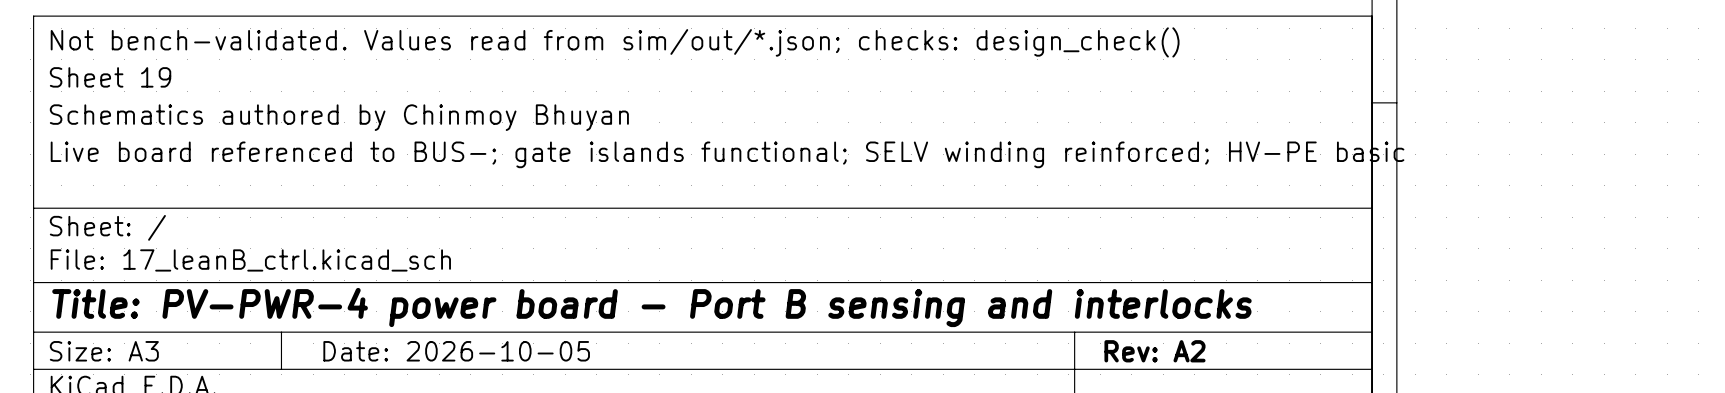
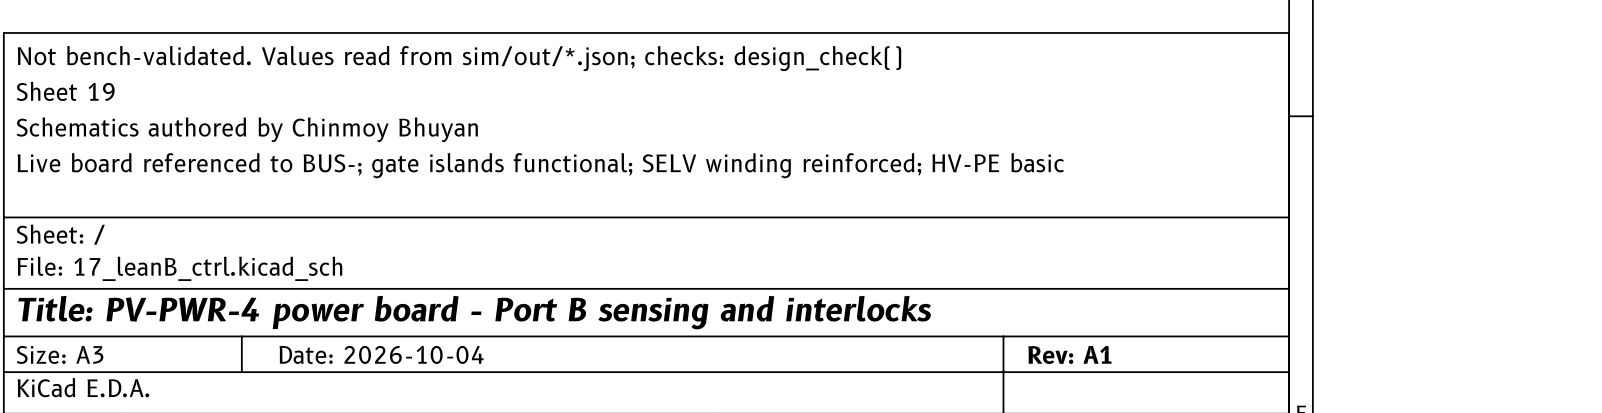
title block: Date: 2026-10-05 (456, 351) -> Date: 2026-10-04 (381, 354)
title block: Rev: A2 (1154, 351) -> Rev: A1 (1069, 354)

